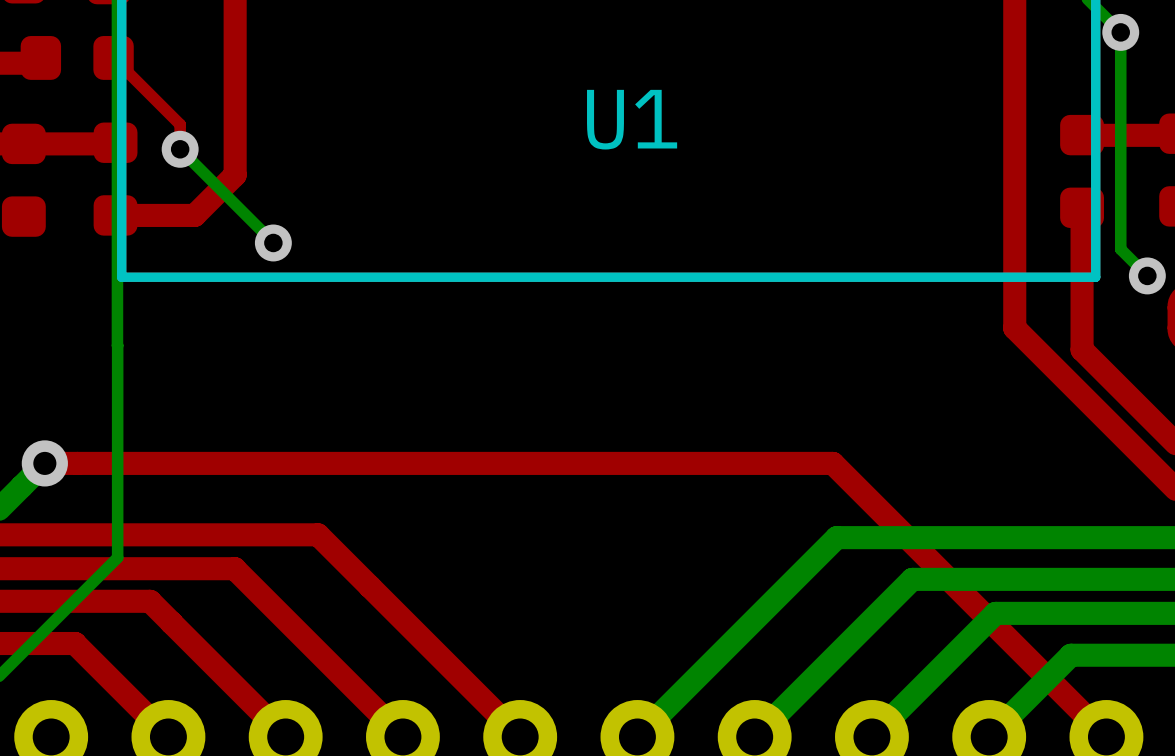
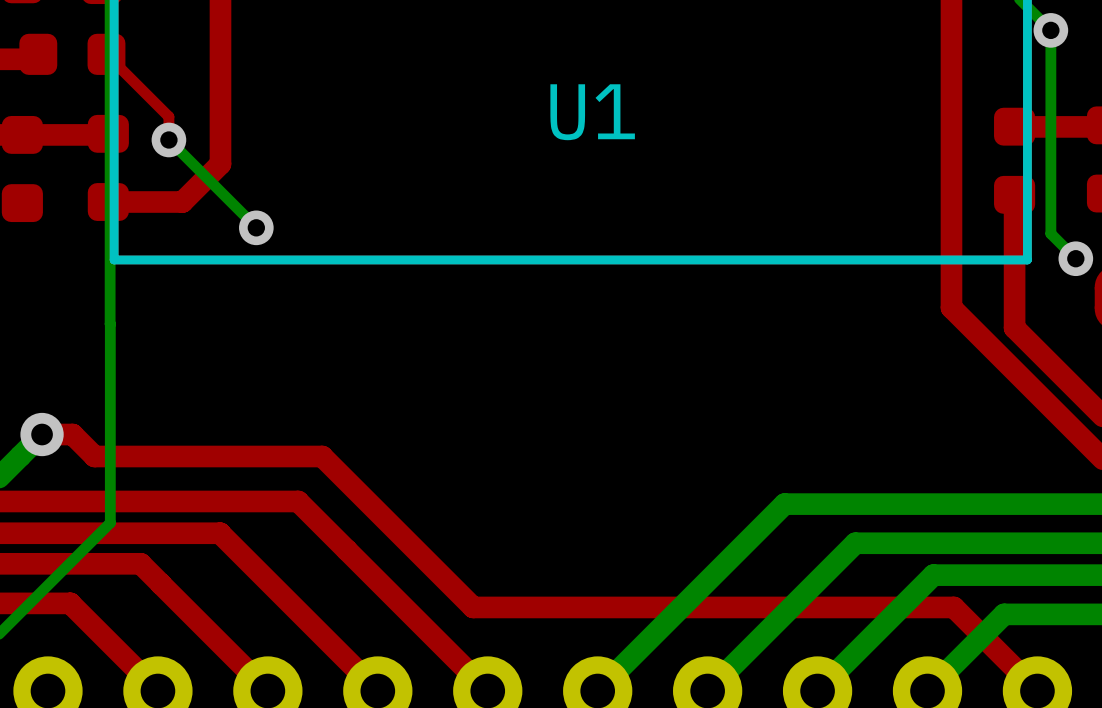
top track: (77, 463) (832, 463) (1017, 647) -> (72, 434) (94, 456) (322, 456) (473, 607) (953, 607)

